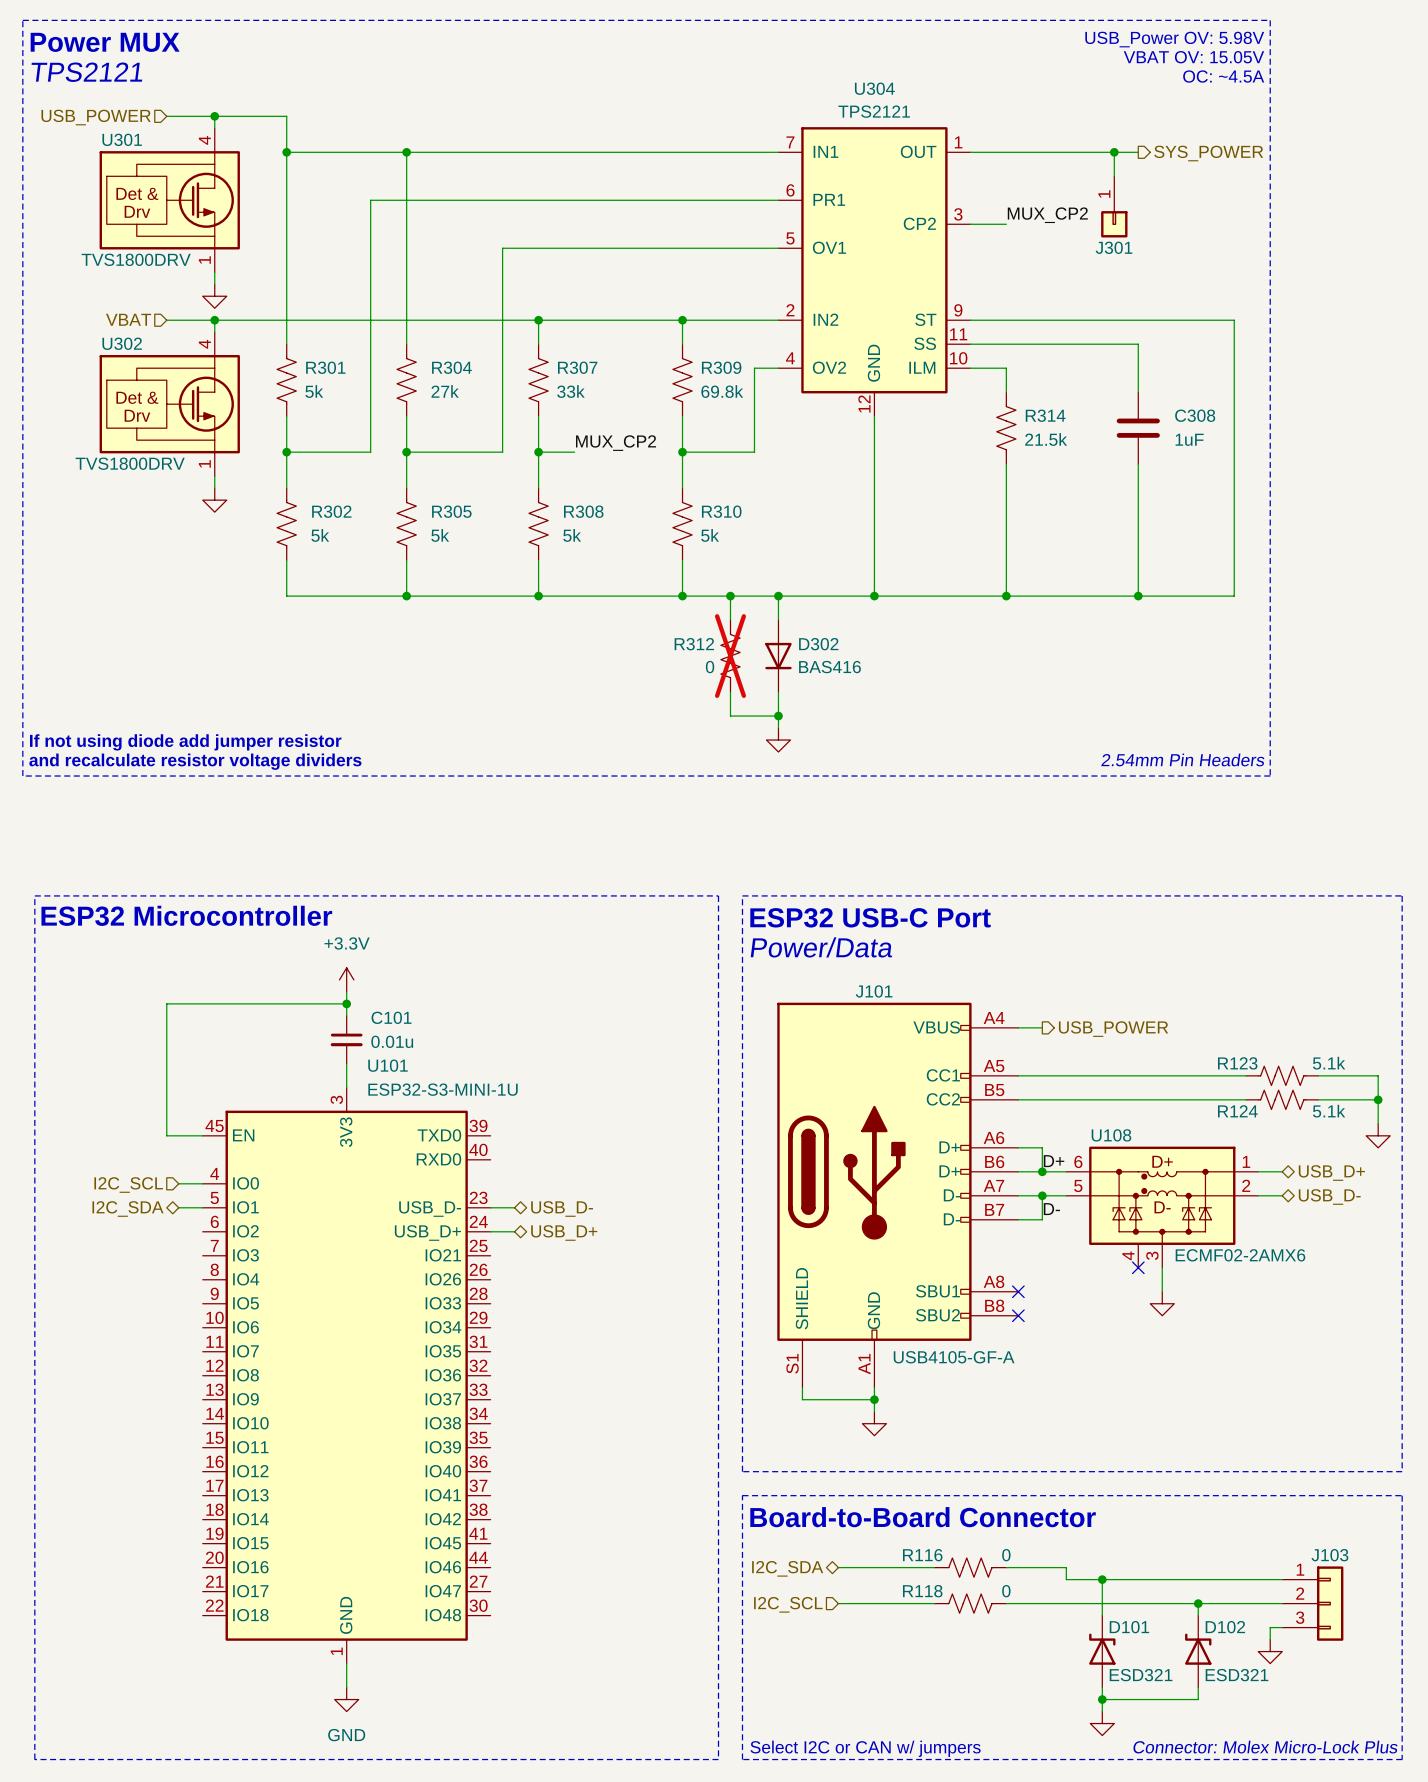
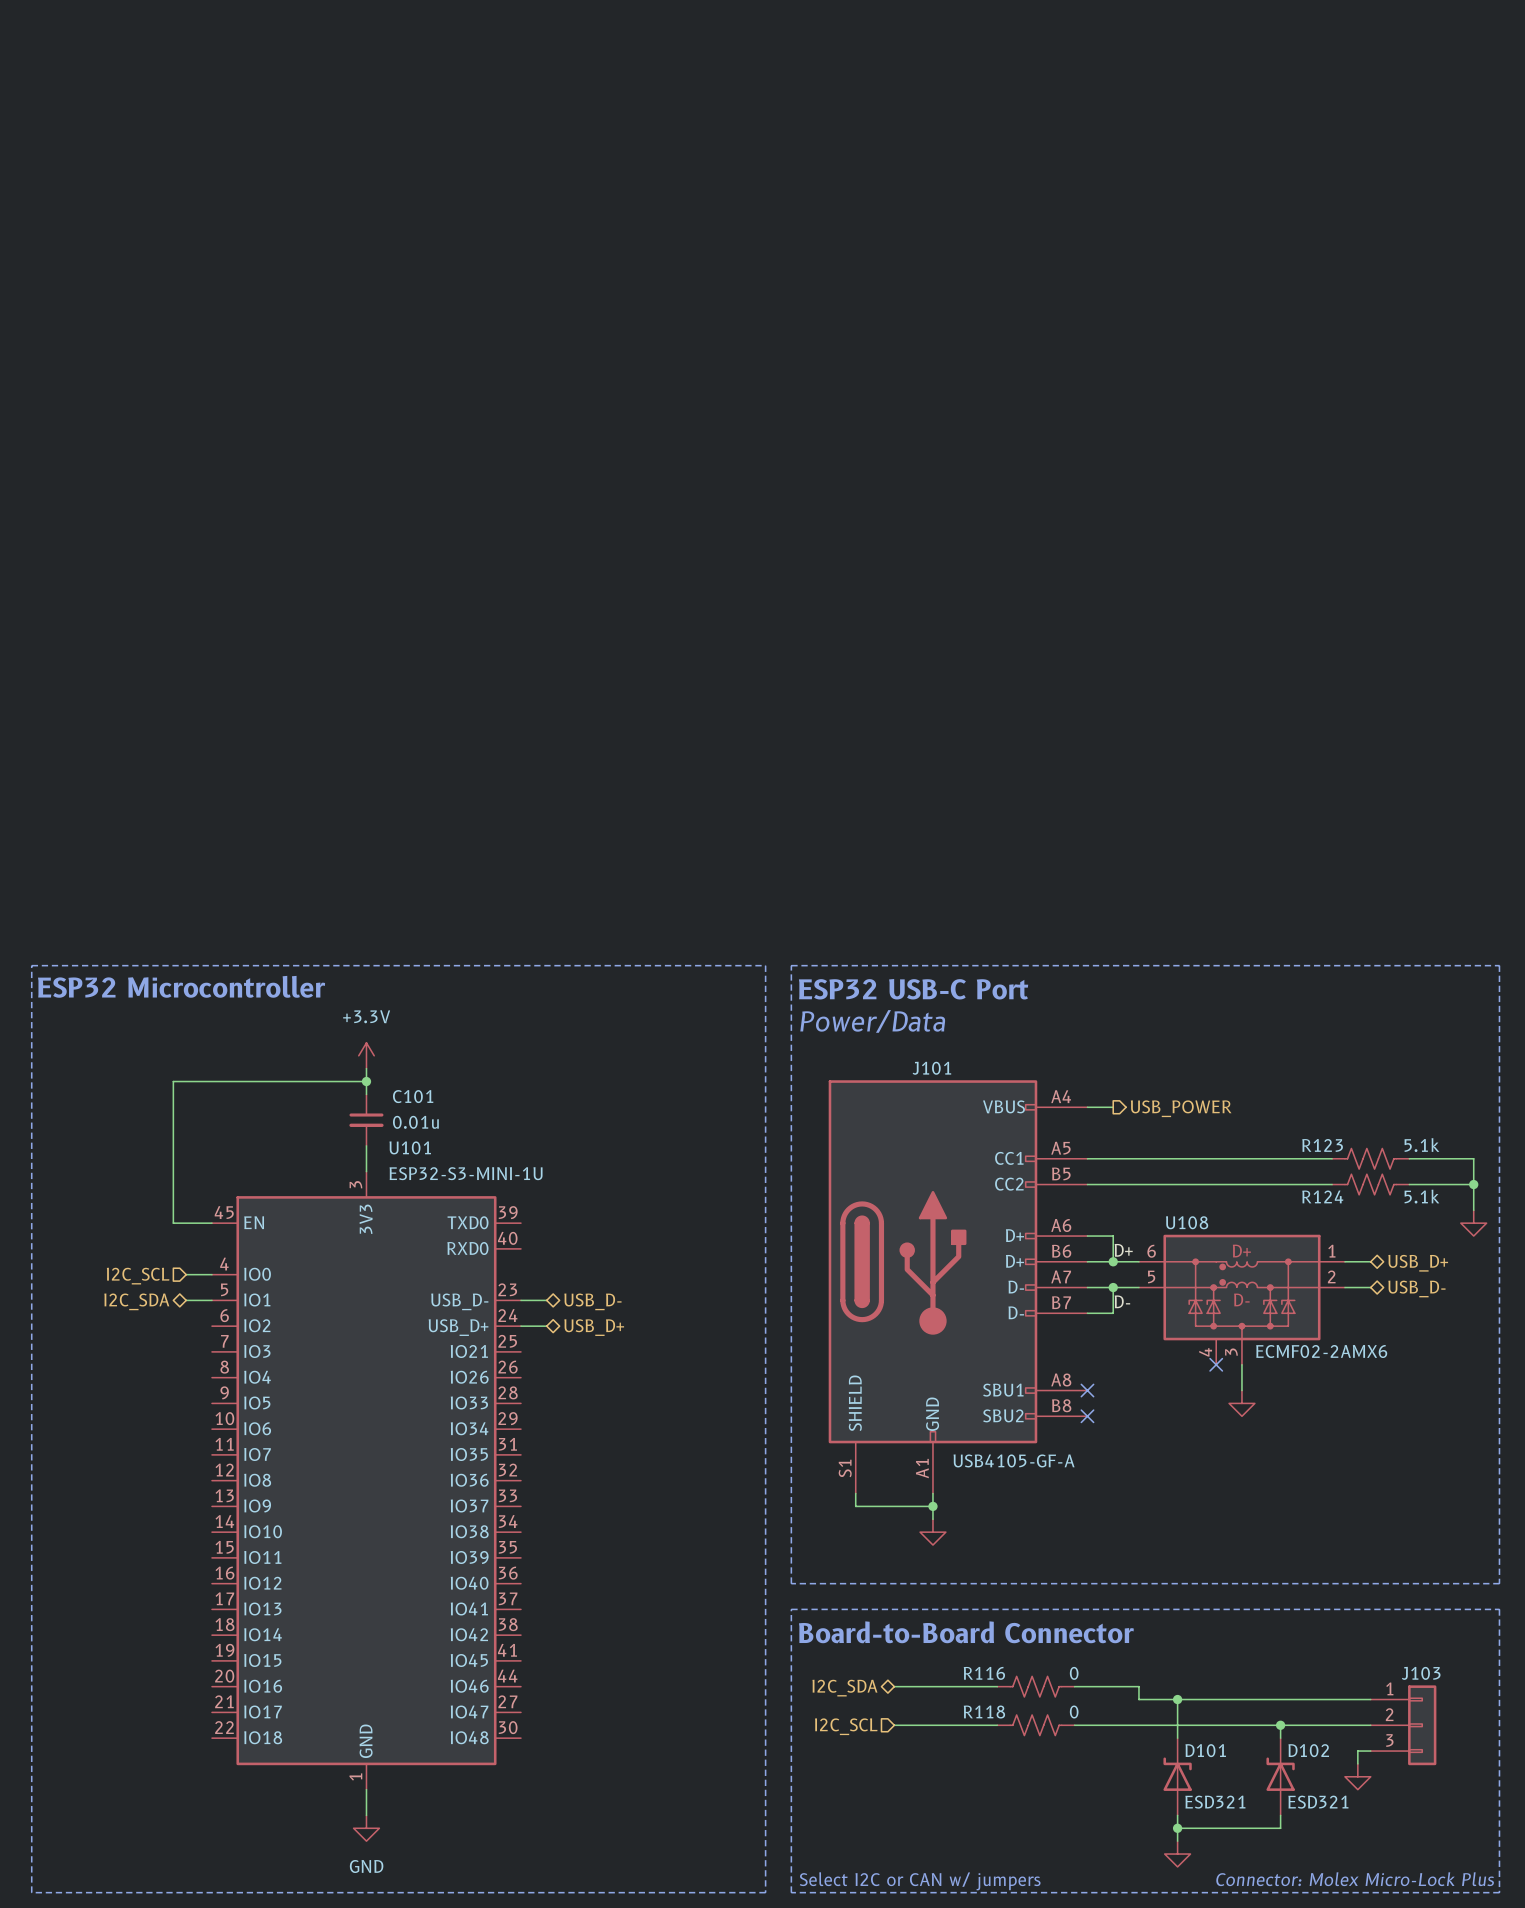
line: (22, 20) (1270, 20) (1270, 776) (22, 776) (22, 20) -> none
text: USB_Power OV: 5.98V (1174, 39) -> none
text: Power MUX (105, 42) -> none
text: VBAT OV: 15.05V (1193, 57) -> none
text: TPS2121 (86, 72) -> none
text: OC: ~4.5A (1223, 76) -> none
wire: (166, 116) (286, 116) (286, 344) -> none
wire: (214, 116) (214, 128) -> none
junction: (214, 116) -> none
hierarchical label: USB_POWER (96, 117) -> none
wire: (286, 152) (778, 152) -> none
junction: (286, 152) -> none
wire: (406, 152) (406, 344) -> none
junction: (406, 152) -> none
wire: (970, 152) (1138, 152) -> none
wire: (1114, 152) (1114, 176) -> none
junction: (1114, 152) -> none
hierarchical label: SYS_POWER (1208, 153) -> none
U301: TVS1800DRV (169, 200) -> none
wire: (778, 200) (370, 200) (370, 452) (286, 452) -> none
J301: (1114, 206) -> none
label: MUX_CP2 (1047, 215) -> none
wire: (970, 224) (1006, 224) -> none
wire: (778, 248) (502, 248) (502, 452) (406, 452) -> none
U304: TPS2121 (874, 271) -> none
wire: (214, 272) (214, 284) -> none
power symbol: (214, 296) -> none
hierarchical label: VBAT (128, 319) -> none
wire: (166, 320) (778, 320) -> none
wire: (214, 320) (214, 332) -> none
junction: (214, 320) -> none
wire: (538, 320) (538, 344) -> none
junction: (538, 320) -> none
wire: (682, 320) (682, 344) -> none
junction: (682, 320) -> none
wire: (970, 320) (1234, 320) (1234, 596) (286, 596) (286, 560) -> none
wire: (970, 344) (1138, 344) (1138, 392) -> none
wire: (778, 368) (754, 368) (754, 452) (682, 452) -> none
wire: (970, 368) (1006, 368) (1006, 392) -> none
R301: 5k (286, 380) -> none
R304: 27k (406, 380) -> none
R307: 33k (538, 380) -> none
R309: 69.8k (682, 380) -> none
U302: TVS1800DRV (169, 404) -> none
wire: (286, 416) (286, 488) -> none
wire: (406, 416) (406, 488) -> none
wire: (538, 416) (538, 488) -> none
wire: (682, 416) (682, 488) -> none
wire: (874, 416) (874, 596) -> none
R314: 21.5k (1006, 428) -> none
C308: 1uF (1138, 428) -> none
label: MUX_CP2 (616, 443) -> none
junction: (286, 452) -> none
junction: (406, 452) -> none
wire: (538, 452) (574, 452) -> none
junction: (538, 452) -> none
junction: (682, 452) -> none
wire: (1006, 464) (1006, 596) -> none
wire: (1138, 464) (1138, 596) -> none
wire: (214, 476) (214, 488) -> none
power symbol: (214, 500) -> none
R302: 5k (286, 524) -> none
R305: 5k (406, 524) -> none
R308: 5k (538, 524) -> none
R310: 5k (682, 524) -> none
wire: (406, 560) (406, 596) -> none
wire: (538, 560) (538, 596) -> none
wire: (682, 560) (682, 596) -> none
junction: (406, 596) -> none
junction: (538, 596) -> none
junction: (682, 596) -> none
wire: (730, 596) (730, 620) -> none
junction: (730, 596) -> none
wire: (778, 596) (778, 620) -> none
junction: (778, 596) -> none
junction: (874, 596) -> none
junction: (1006, 596) -> none
junction: (1138, 596) -> none
R312: 0 (730, 656) -> none
D302: BAS416 (778, 656) -> none
wire: (730, 692) (730, 716) (778, 716) -> none
wire: (778, 692) (778, 728) -> none
junction: (778, 716) -> none
power symbol: (778, 740) -> none
text: If not using diode add jumper resistor (185, 742) -> none
text: 2.54mm Pin Headers (1182, 759) -> none
text: and recalculate resistor voltage dividers (195, 761) -> none

